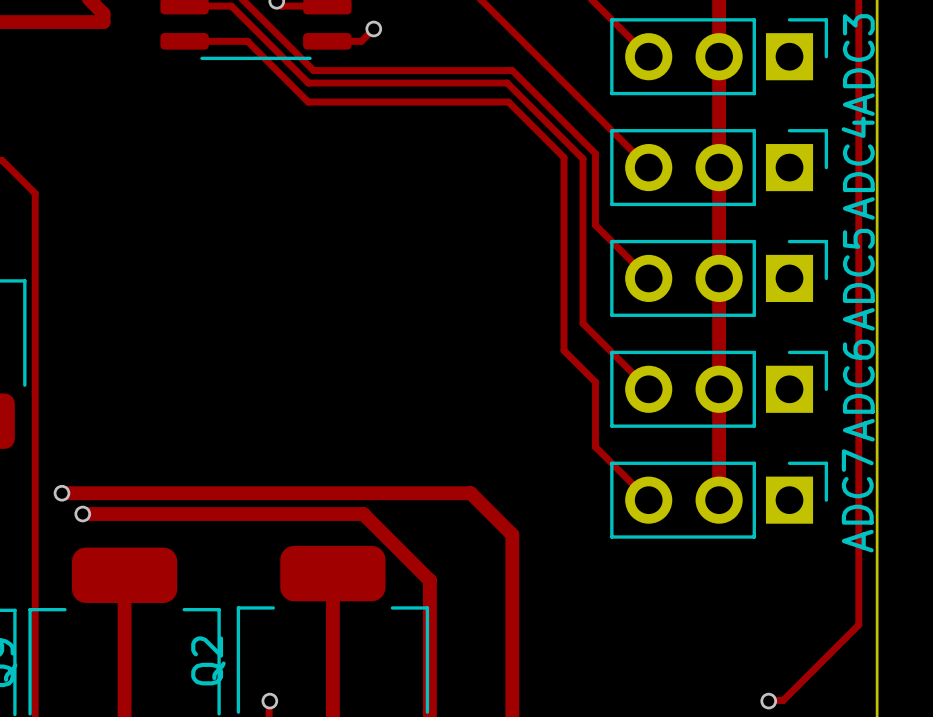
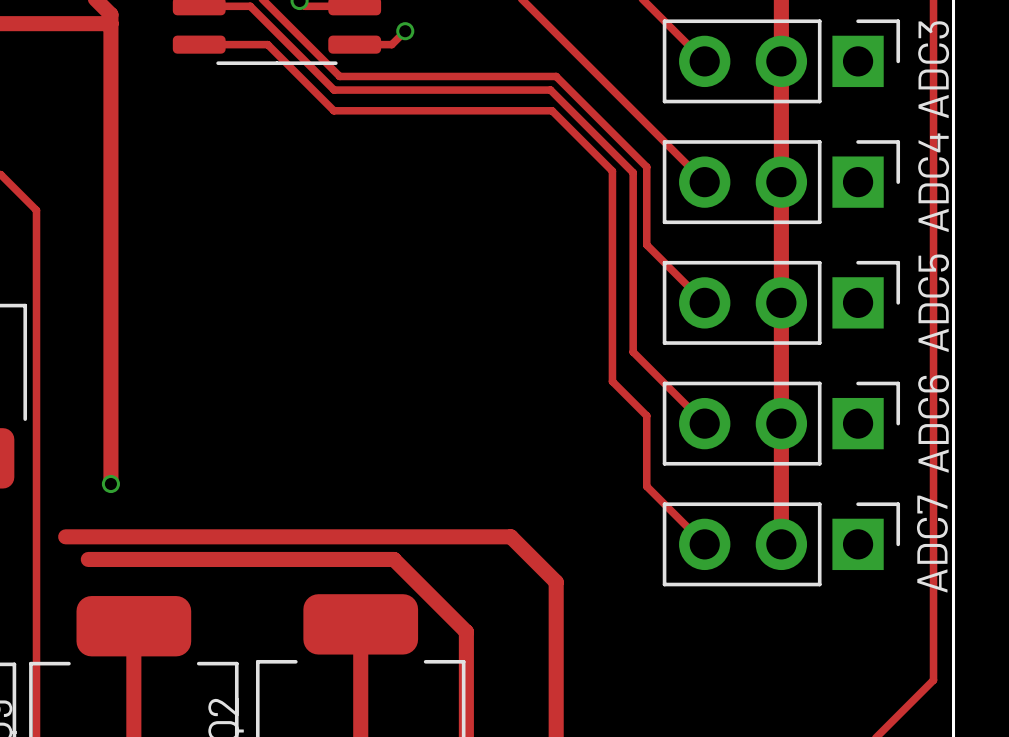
track: none -> (110, 23) (110, 484)
via: none -> (110, 484)
via: (61, 493) -> none
via: (82, 514) -> none

